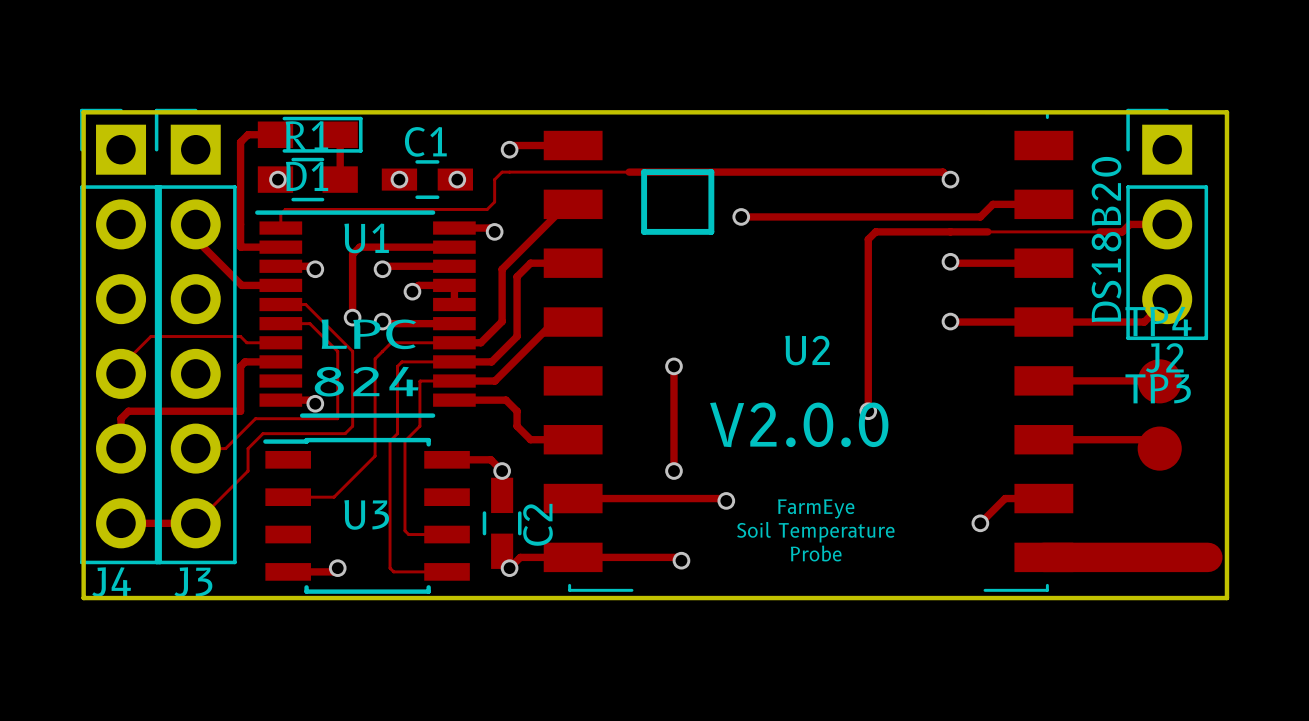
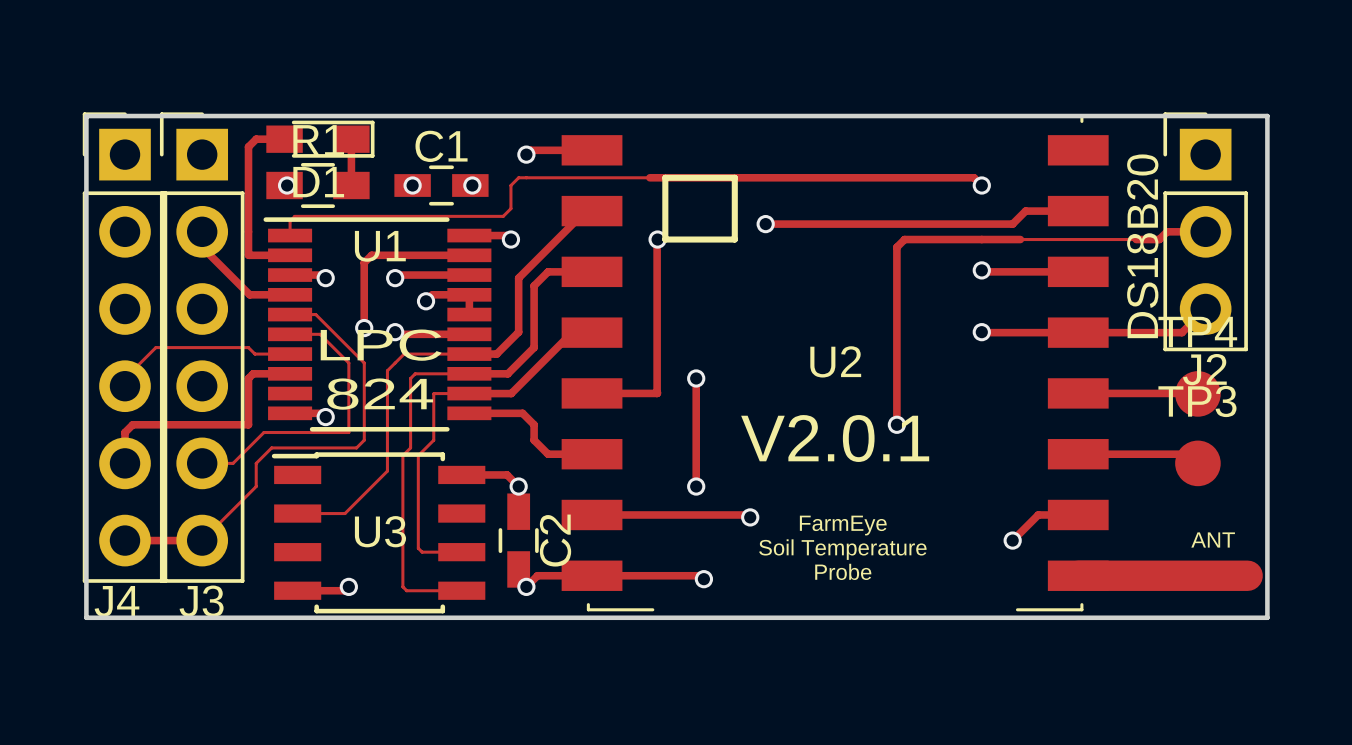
track: none -> (657, 239) (657, 393)
via: none -> (657, 239)
track: none -> (592, 393) (657, 393)
text: V2.0.0 (799, 424) -> V2.0.1 (835, 438)
text: none -> ANT (1213, 540)

